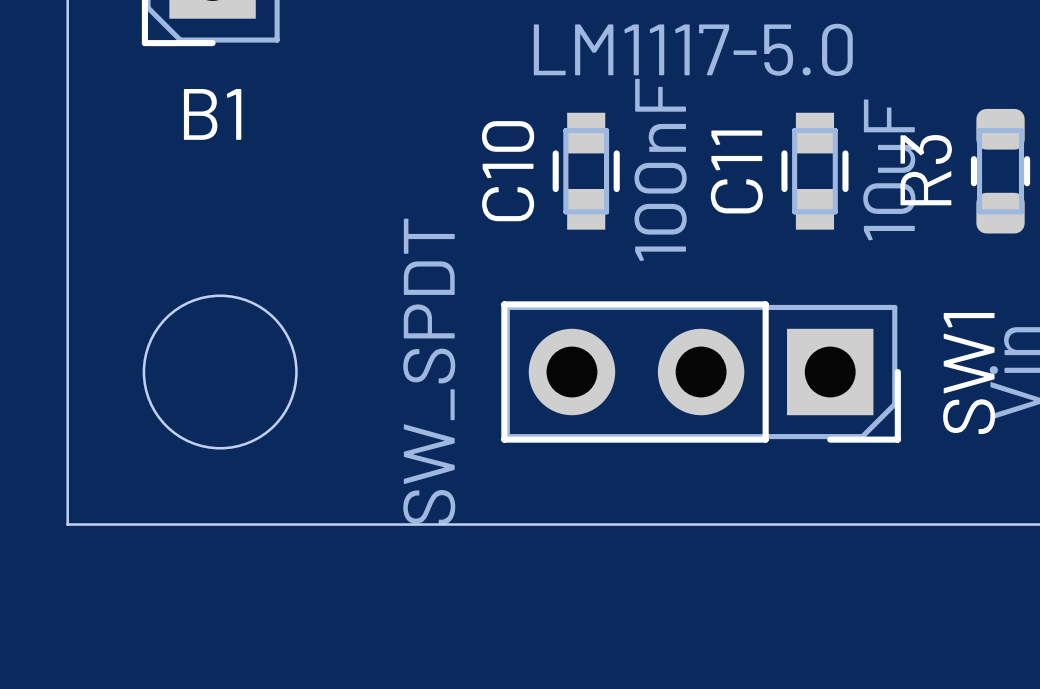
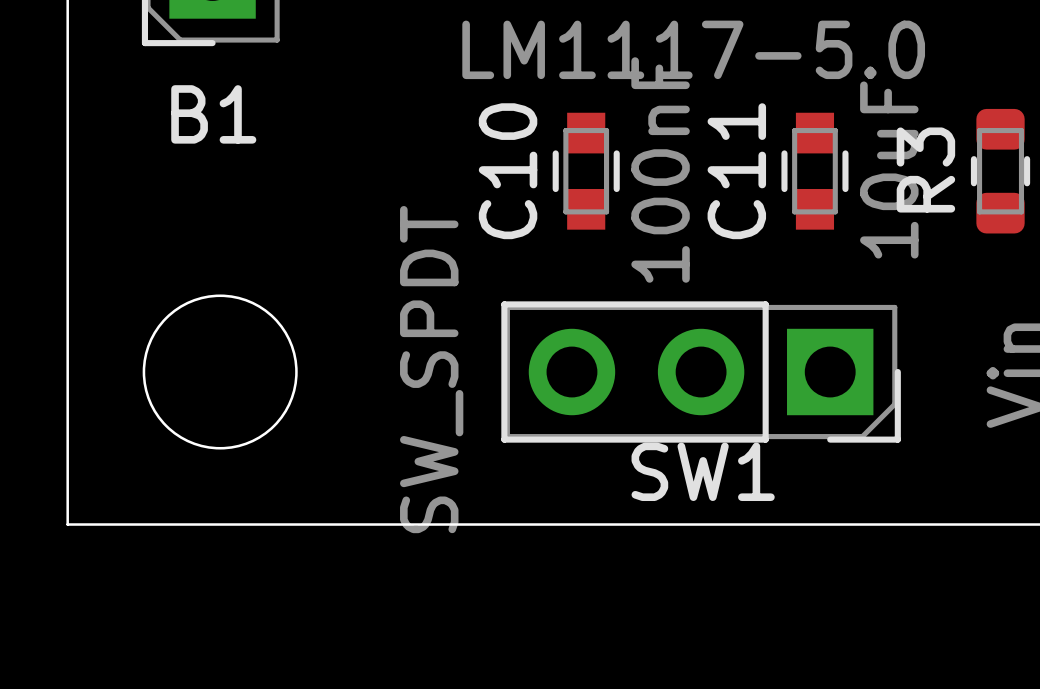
SW1 name rotation: 0° (969, 373) -> 90° clockwise (703, 471)
SW1 name position: SW1 (969, 373) -> SW1 (703, 471)

